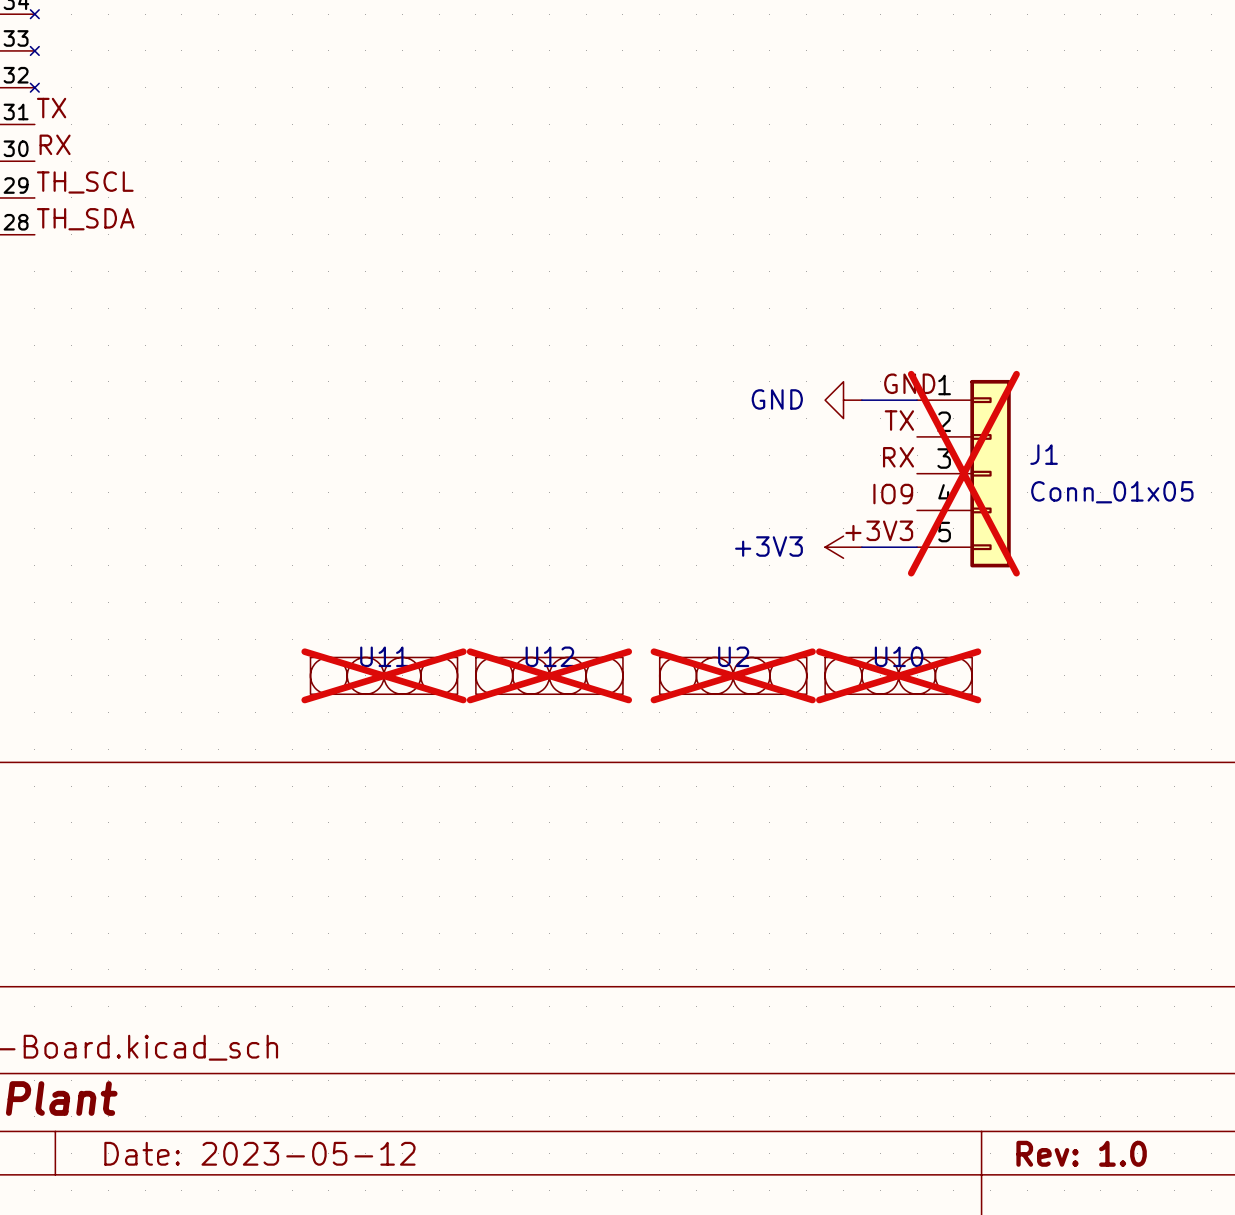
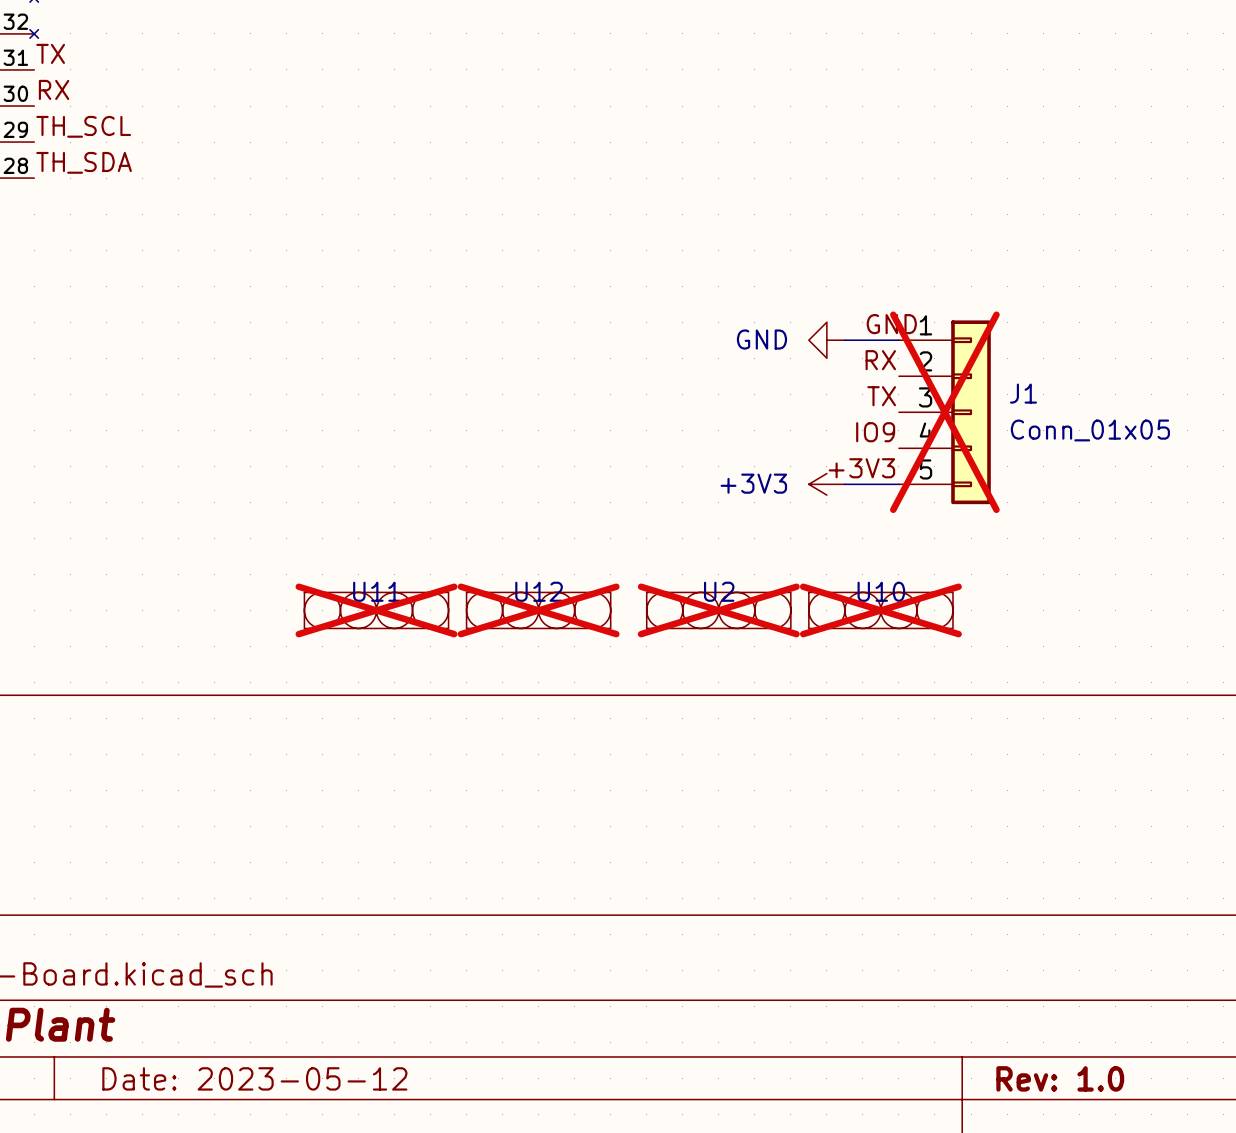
label: TX (899, 420) -> RX (880, 360)
label: RX (898, 457) -> TX (881, 396)

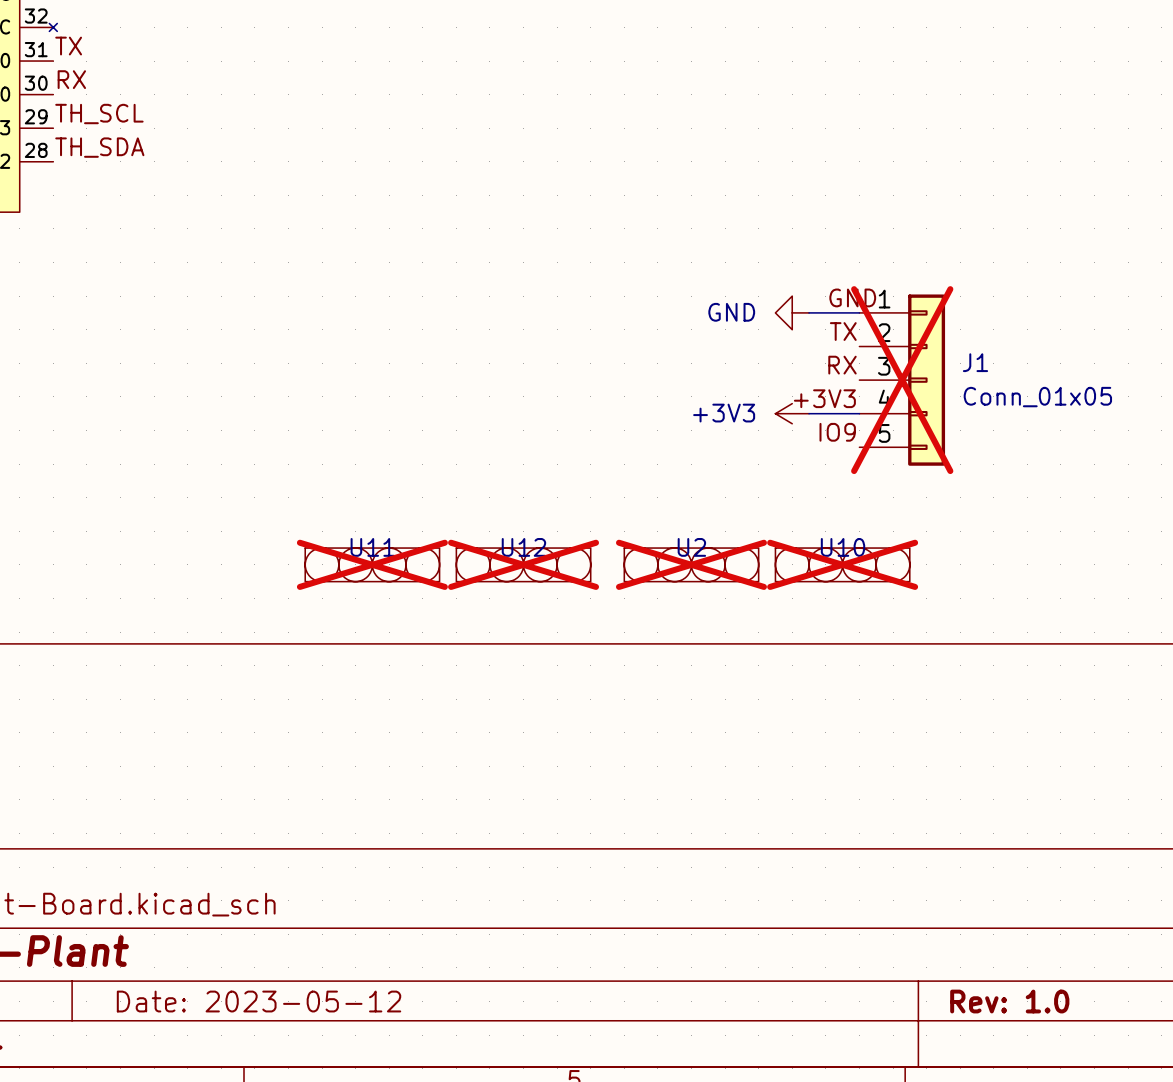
label: RX (880, 360) -> TX (843, 331)
label: TX (881, 396) -> RX (842, 365)
label: IO9 (875, 432) -> +3V3 (824, 398)
label: +3V3 (861, 468) -> IO9 (837, 432)
power symbol position: +3V3 (826, 484) -> +3V3 (792, 413)
wire: (844, 484) (898, 484) -> (809, 413) (859, 413)

